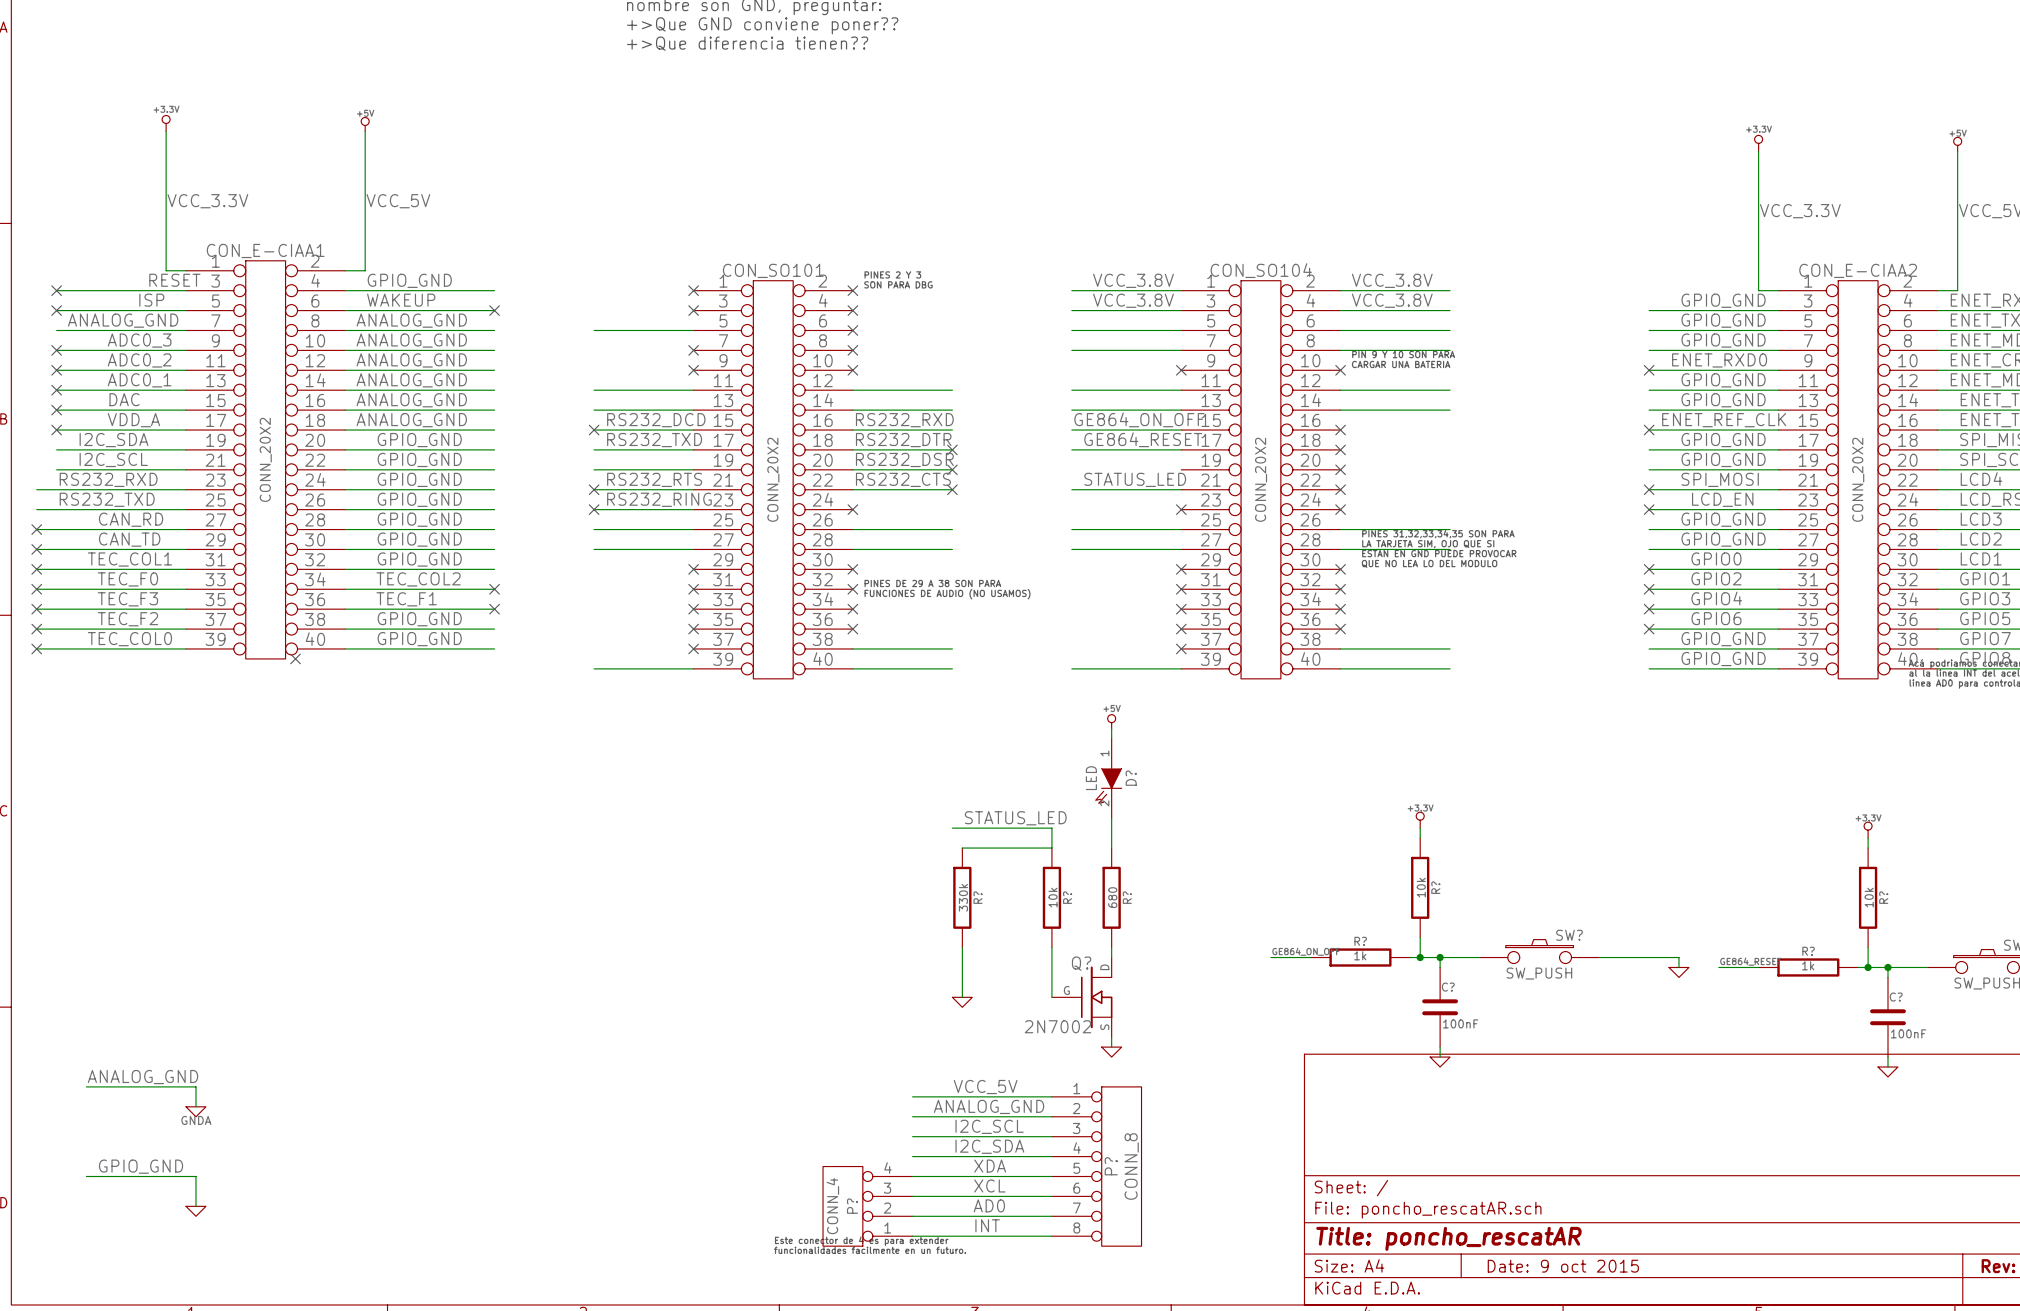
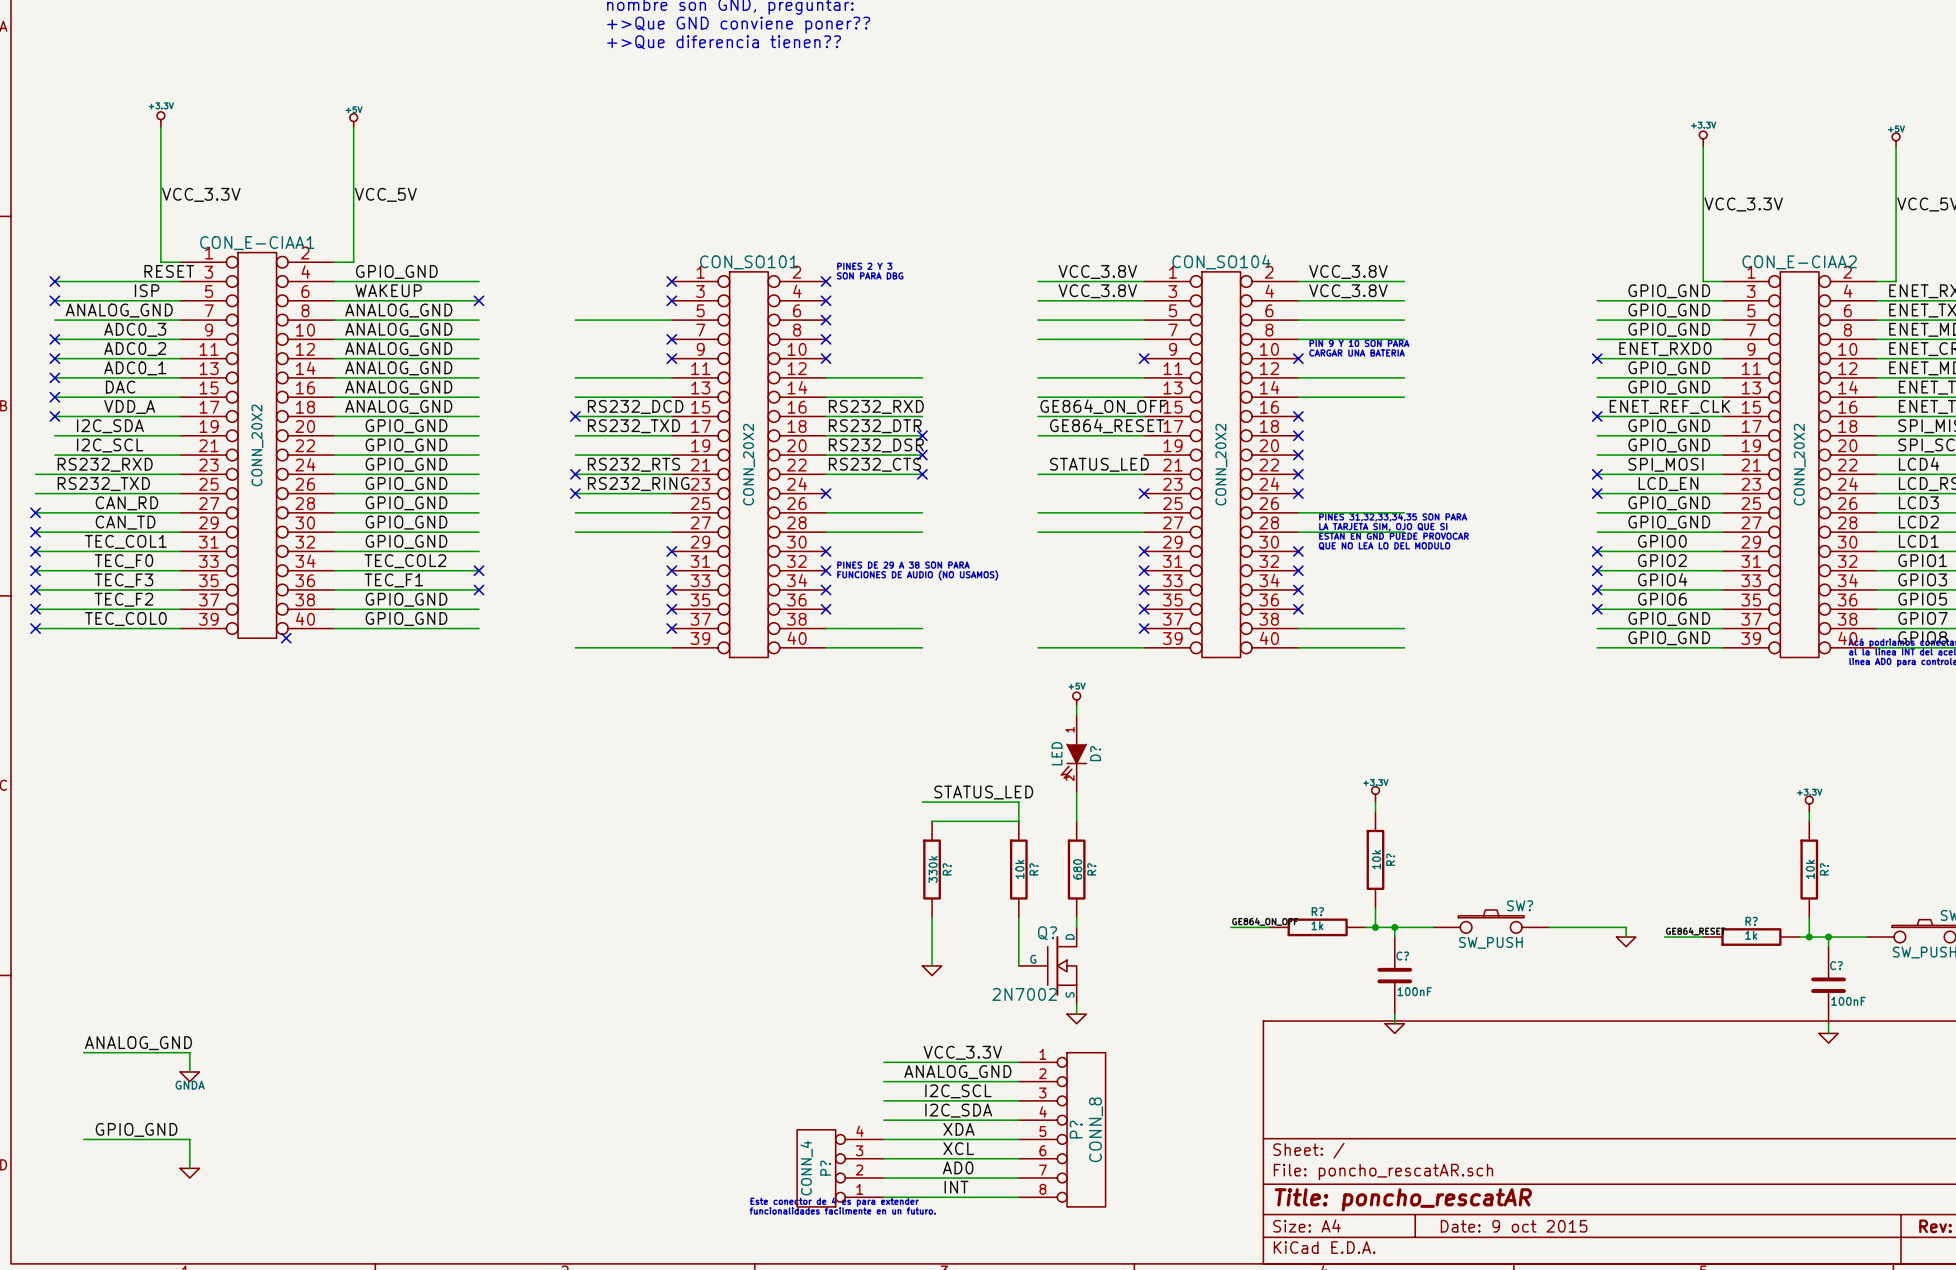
label: VCC_5V (985, 1087) -> VCC_3.3V (962, 1052)

